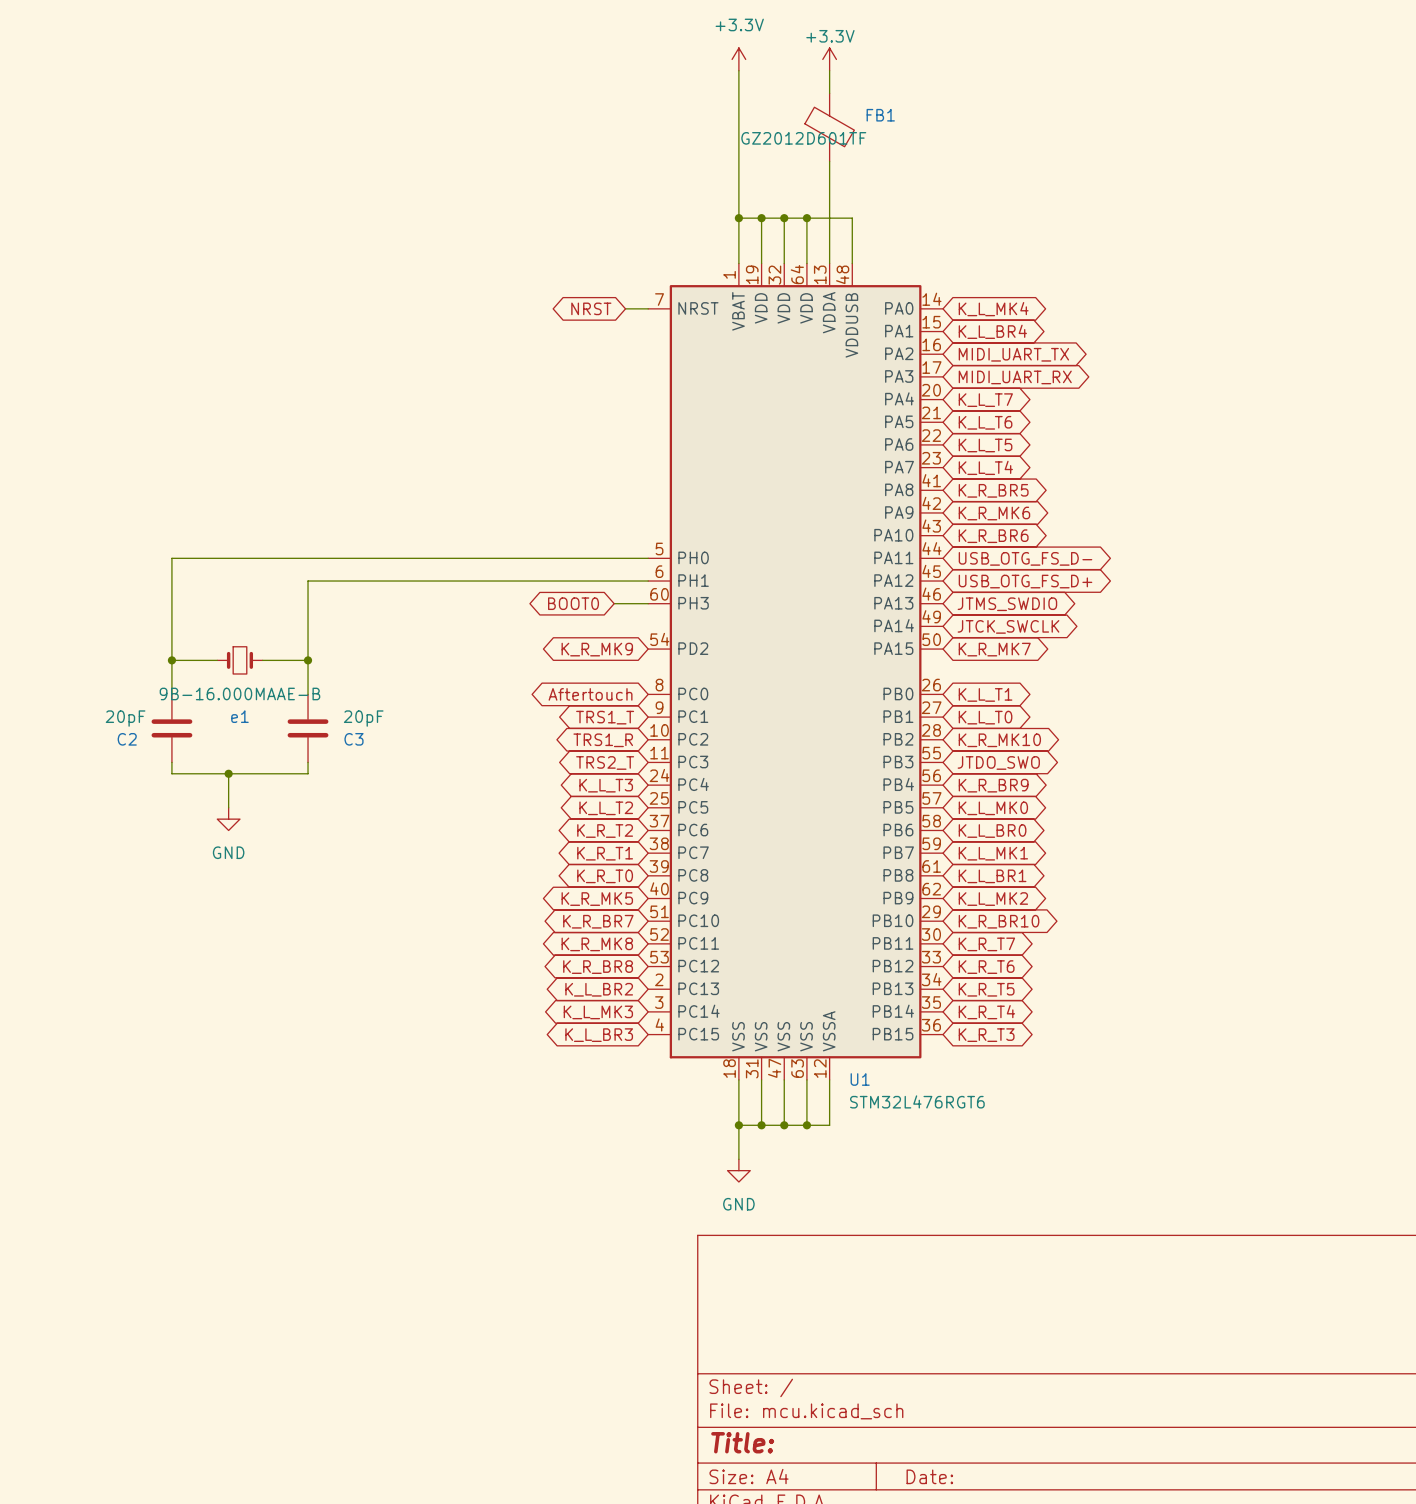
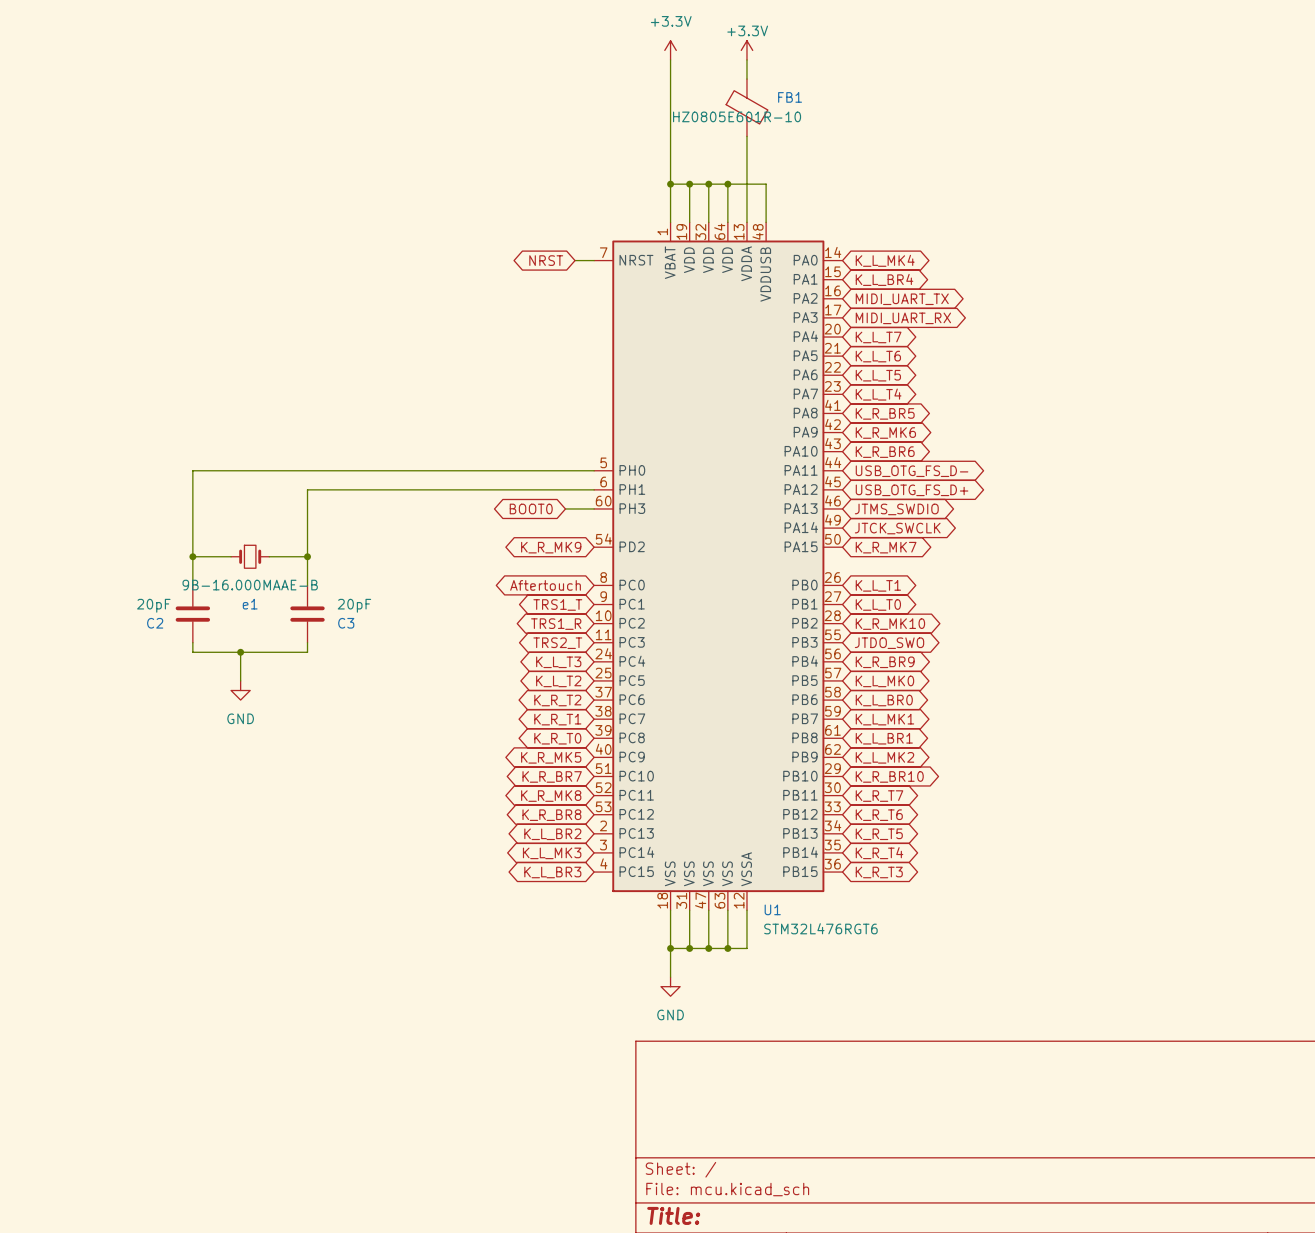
FB1 value: GZ2012D601TF (803, 138) -> HZ0805E601R-10 (737, 116)

